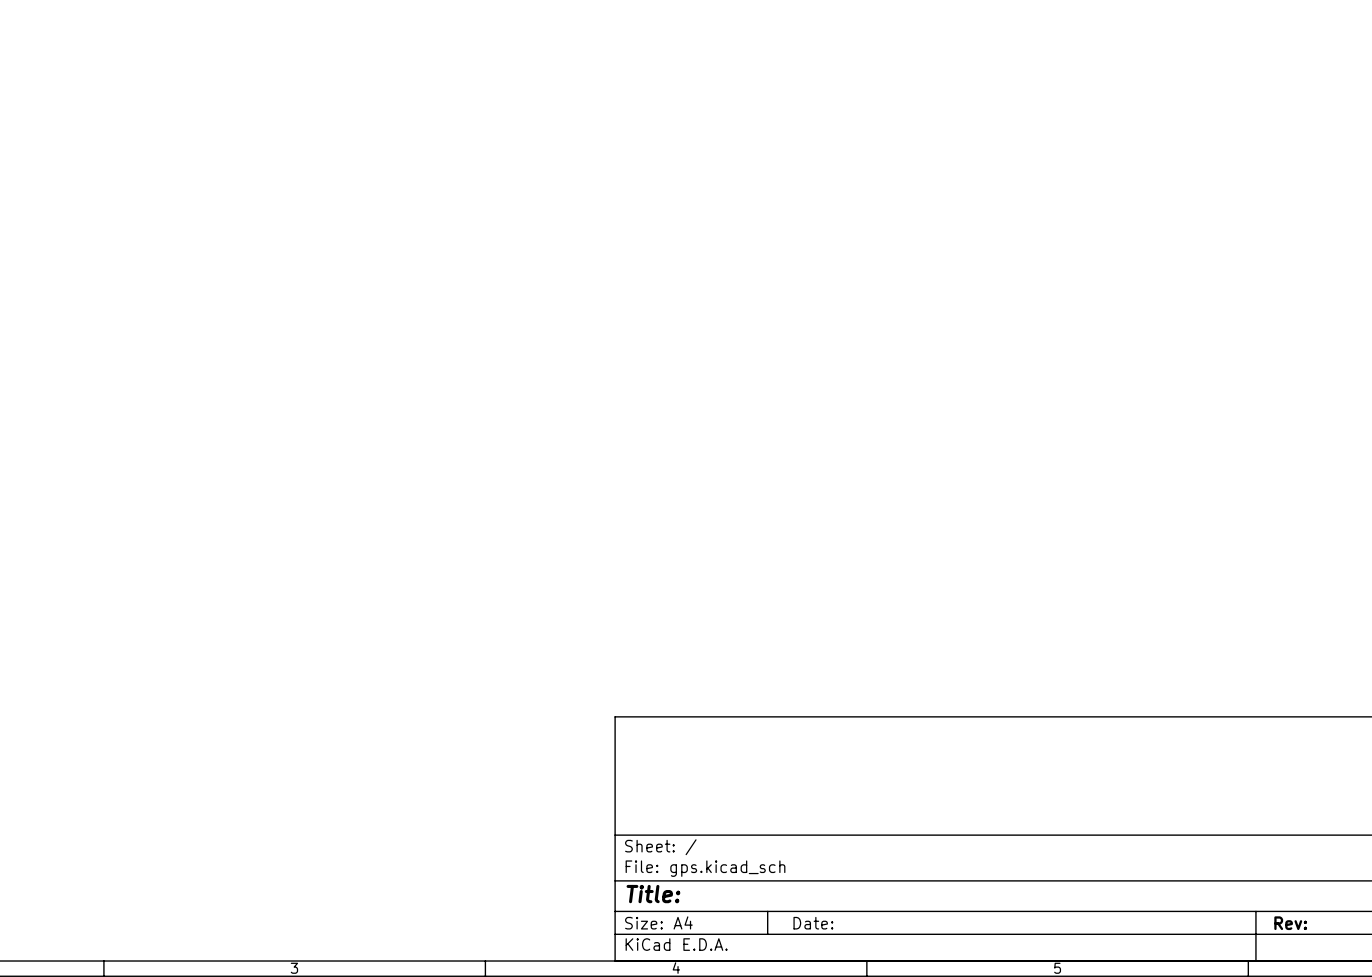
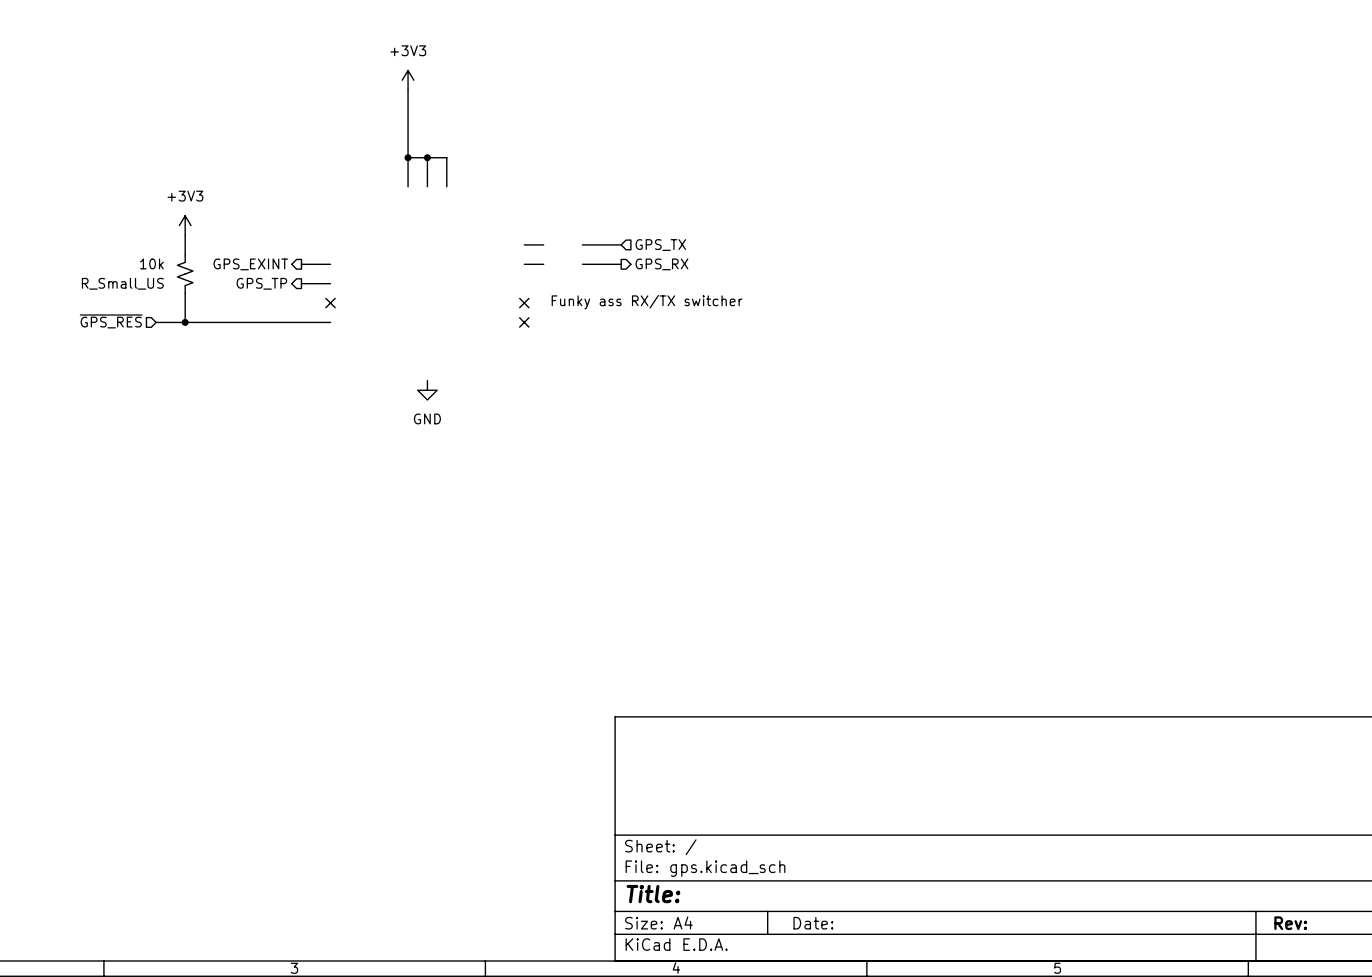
power symbol: none -> +3V3 (408, 80)
wire: none -> (408, 89) (408, 186)
wire: none -> (408, 157) (446, 157) (446, 186)
junction: none -> (408, 157)
wire: none -> (427, 157) (427, 186)
junction: none -> (427, 157)
power symbol: none -> +3V3 (185, 225)
wire: none -> (185, 235) (185, 254)
wire: none -> (524, 244) (543, 244)
wire: none -> (582, 244) (621, 244)
hierarchical label: none -> GPS_TX (660, 245)
hierarchical label: none -> GPS_EXINT (250, 264)
wire: none -> (301, 264) (330, 264)
wire: none -> (524, 264) (543, 264)
wire: none -> (582, 264) (621, 264)
hierarchical label: none -> GPS_RX (661, 264)
10k: none -> R_Small_US (185, 273)
hierarchical label: none -> GPS_TP (261, 283)
wire: none -> (301, 283) (330, 283)
wire: none -> (185, 293) (185, 322)
text: none -> Funky ass RX/TX switcher (647, 302)
no-connect mark: none -> (330, 303)
no-connect mark: none -> (524, 303)
hierarchical label: none -> ~{GPS_RES} (111, 321)
wire: none -> (156, 322) (330, 322)
junction: none -> (185, 322)
no-connect mark: none -> (524, 322)
power symbol: none -> GND (427, 390)

